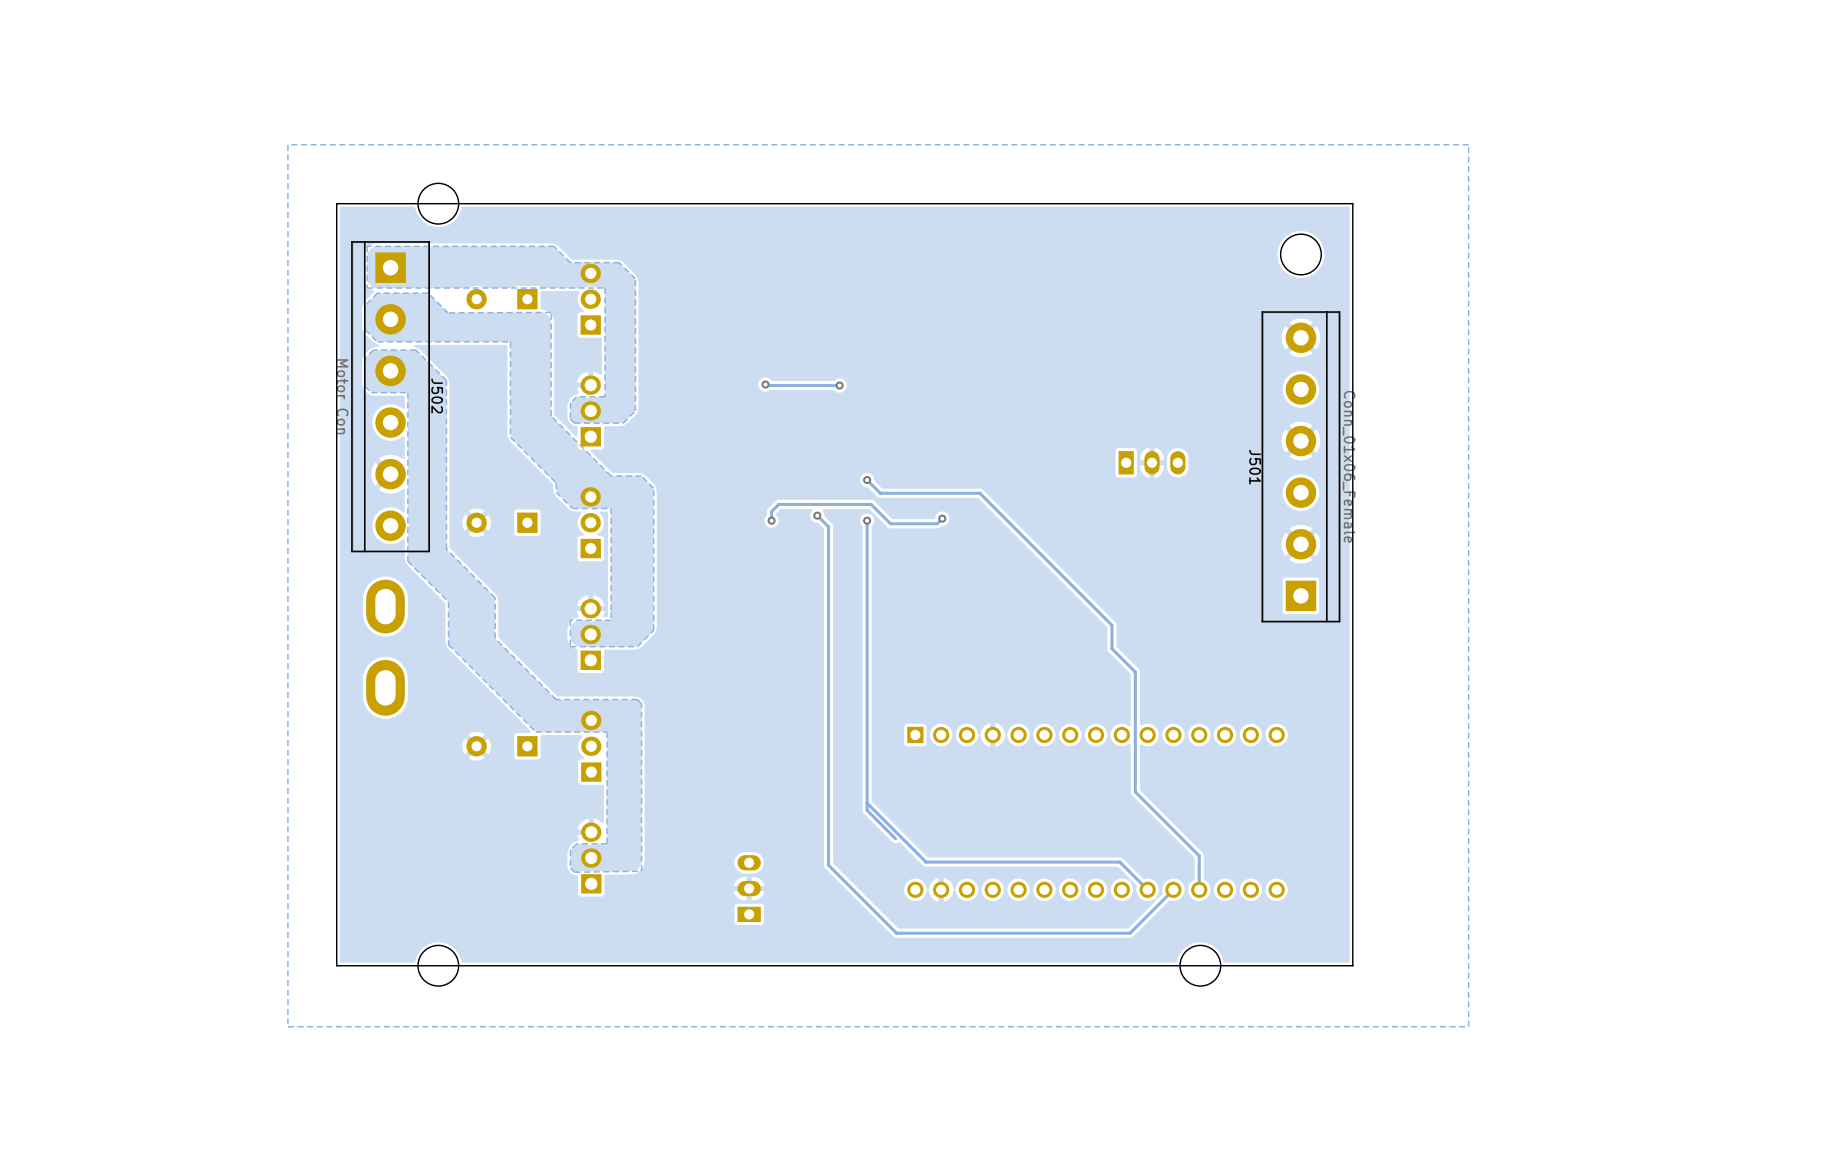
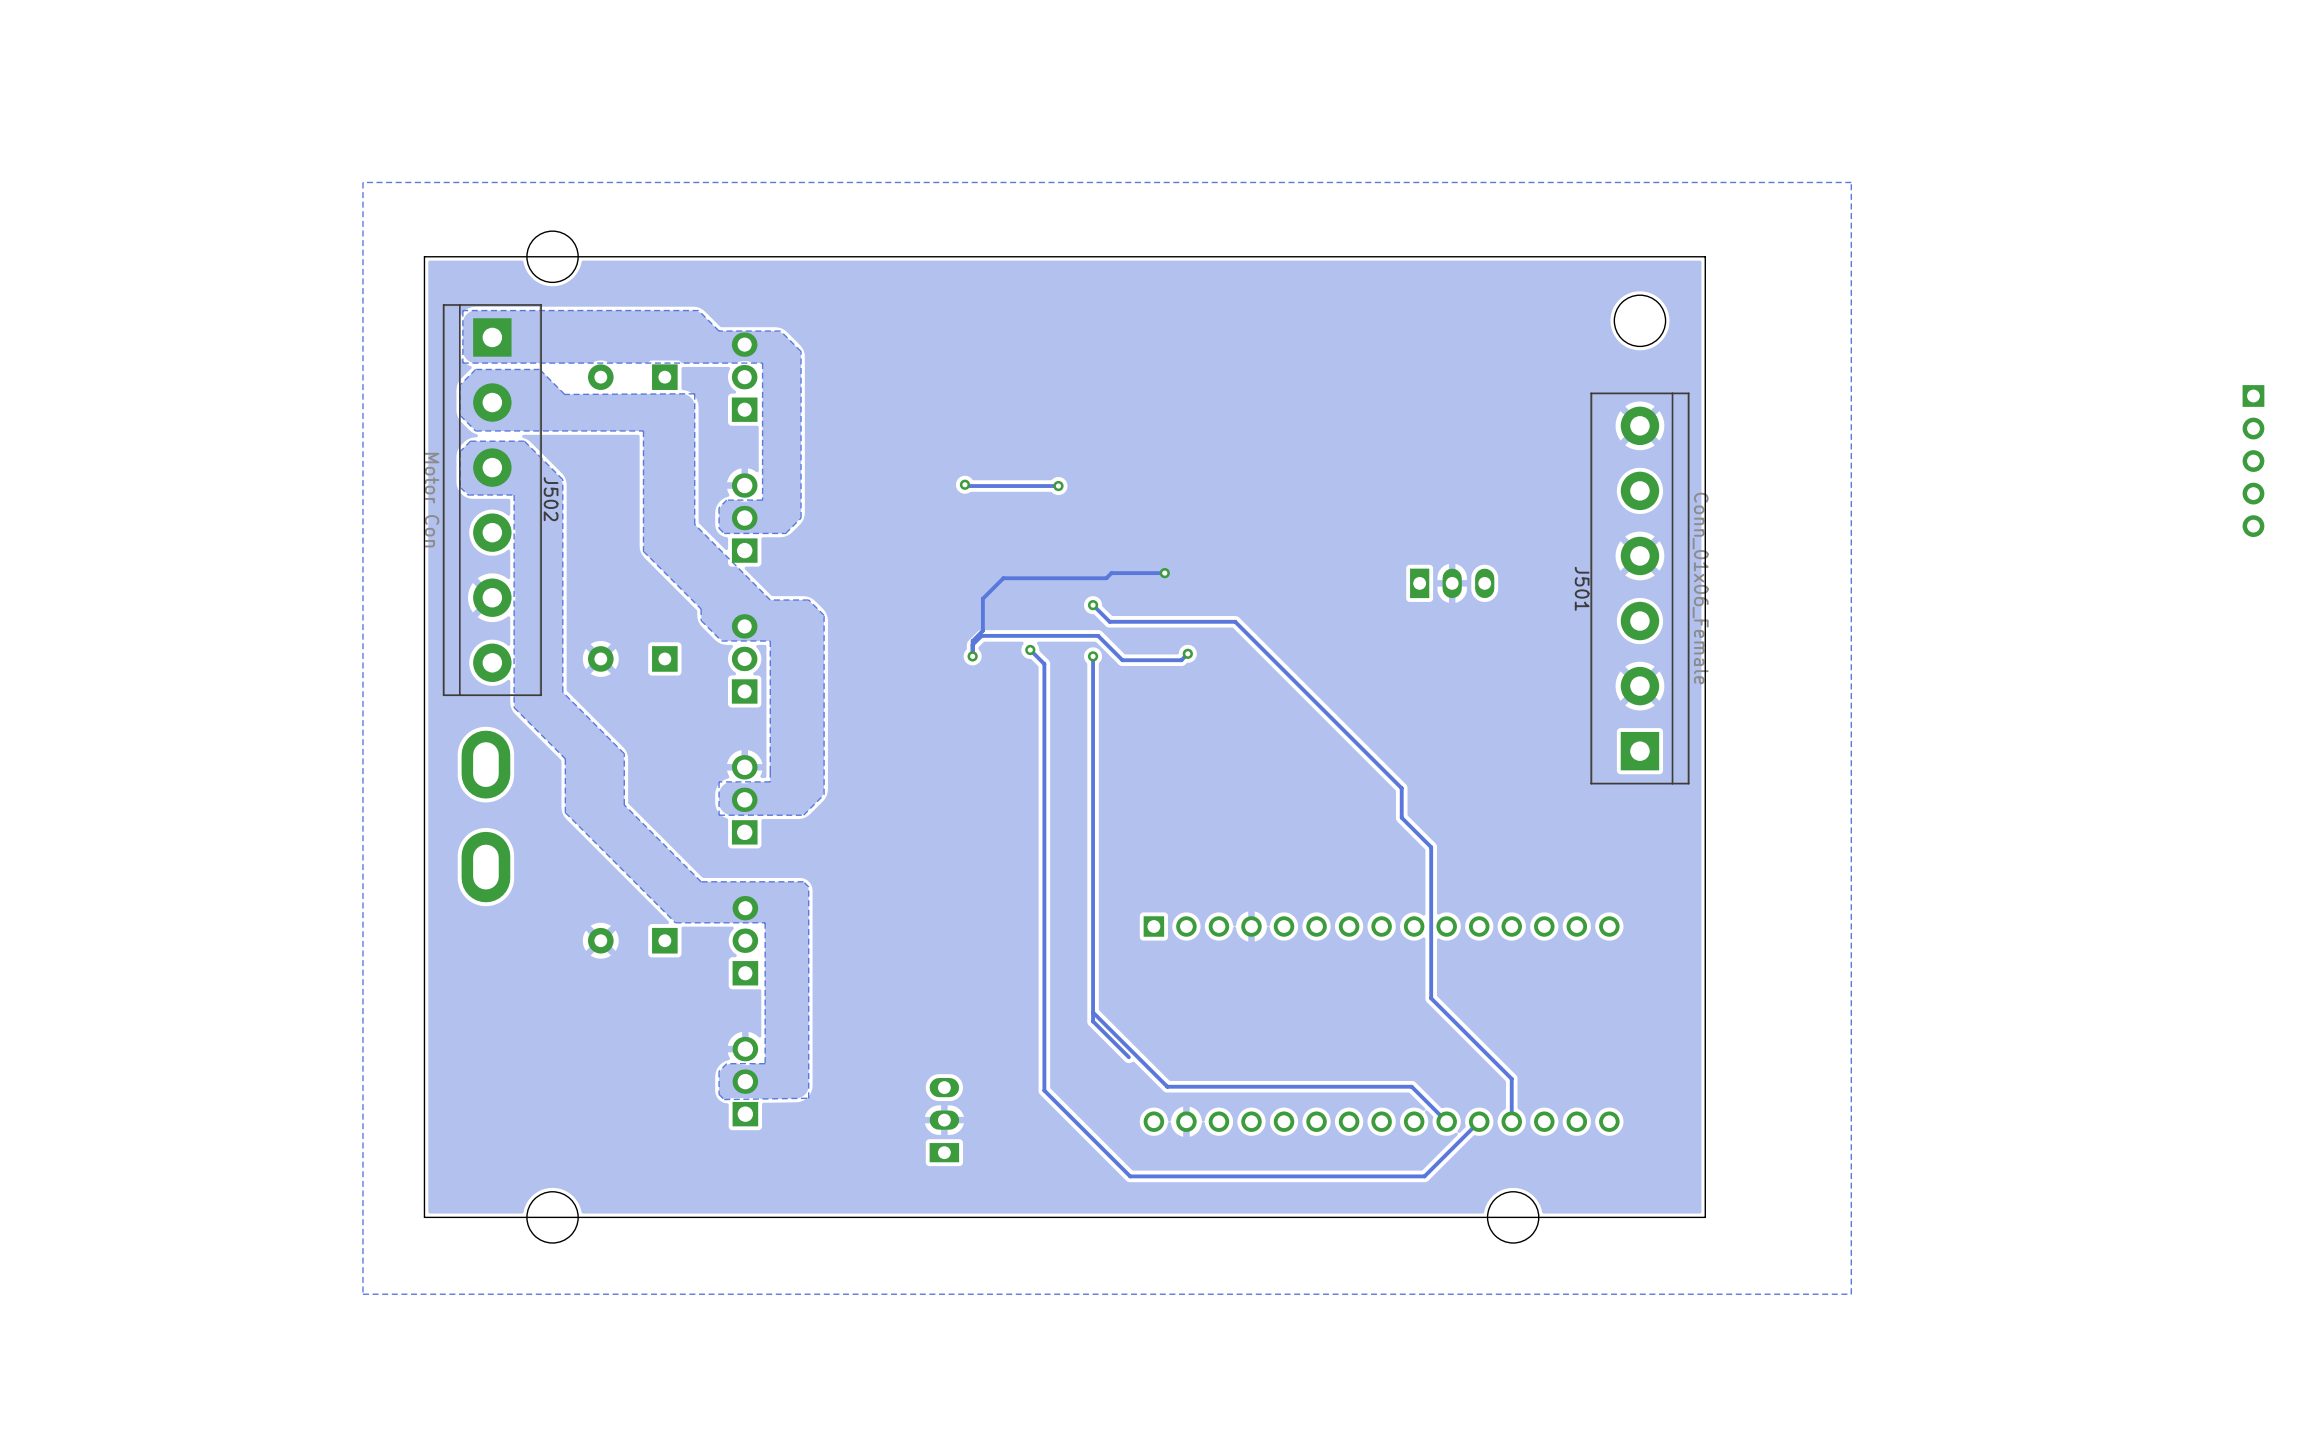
part: none -> (2253, 461)
track: none -> (1164, 573) (1111, 573) (1106, 578) (1003, 578) (982, 598) (982, 630) (972, 641) (972, 644)
via: none -> (1164, 573)

